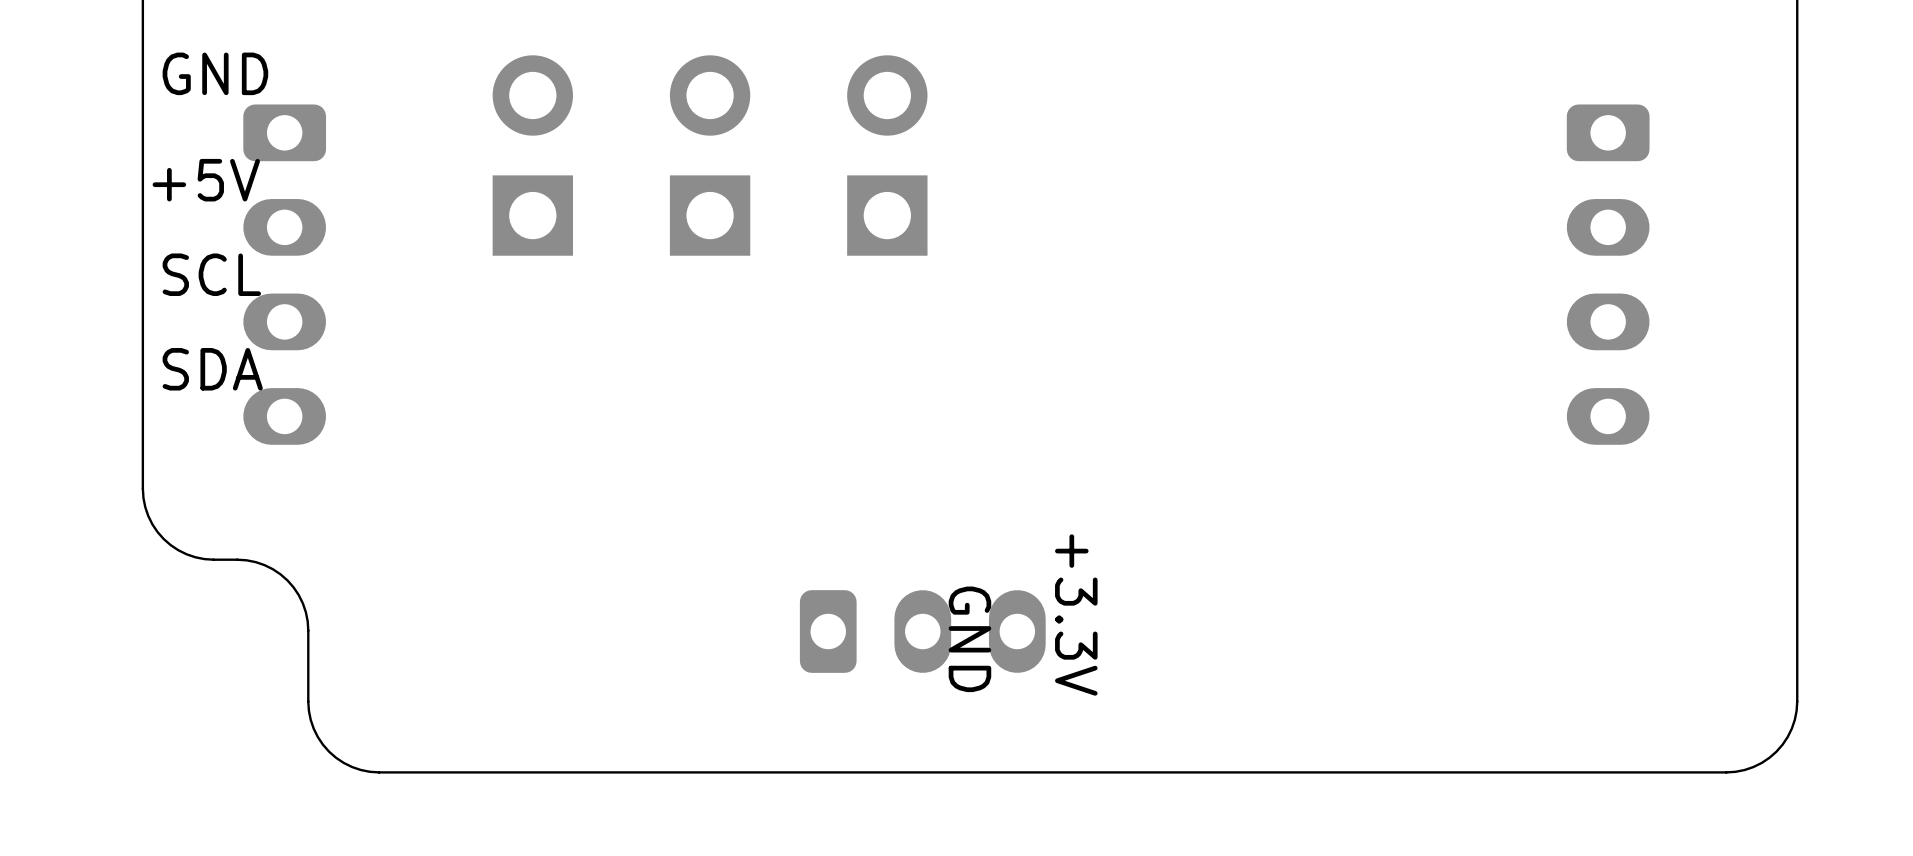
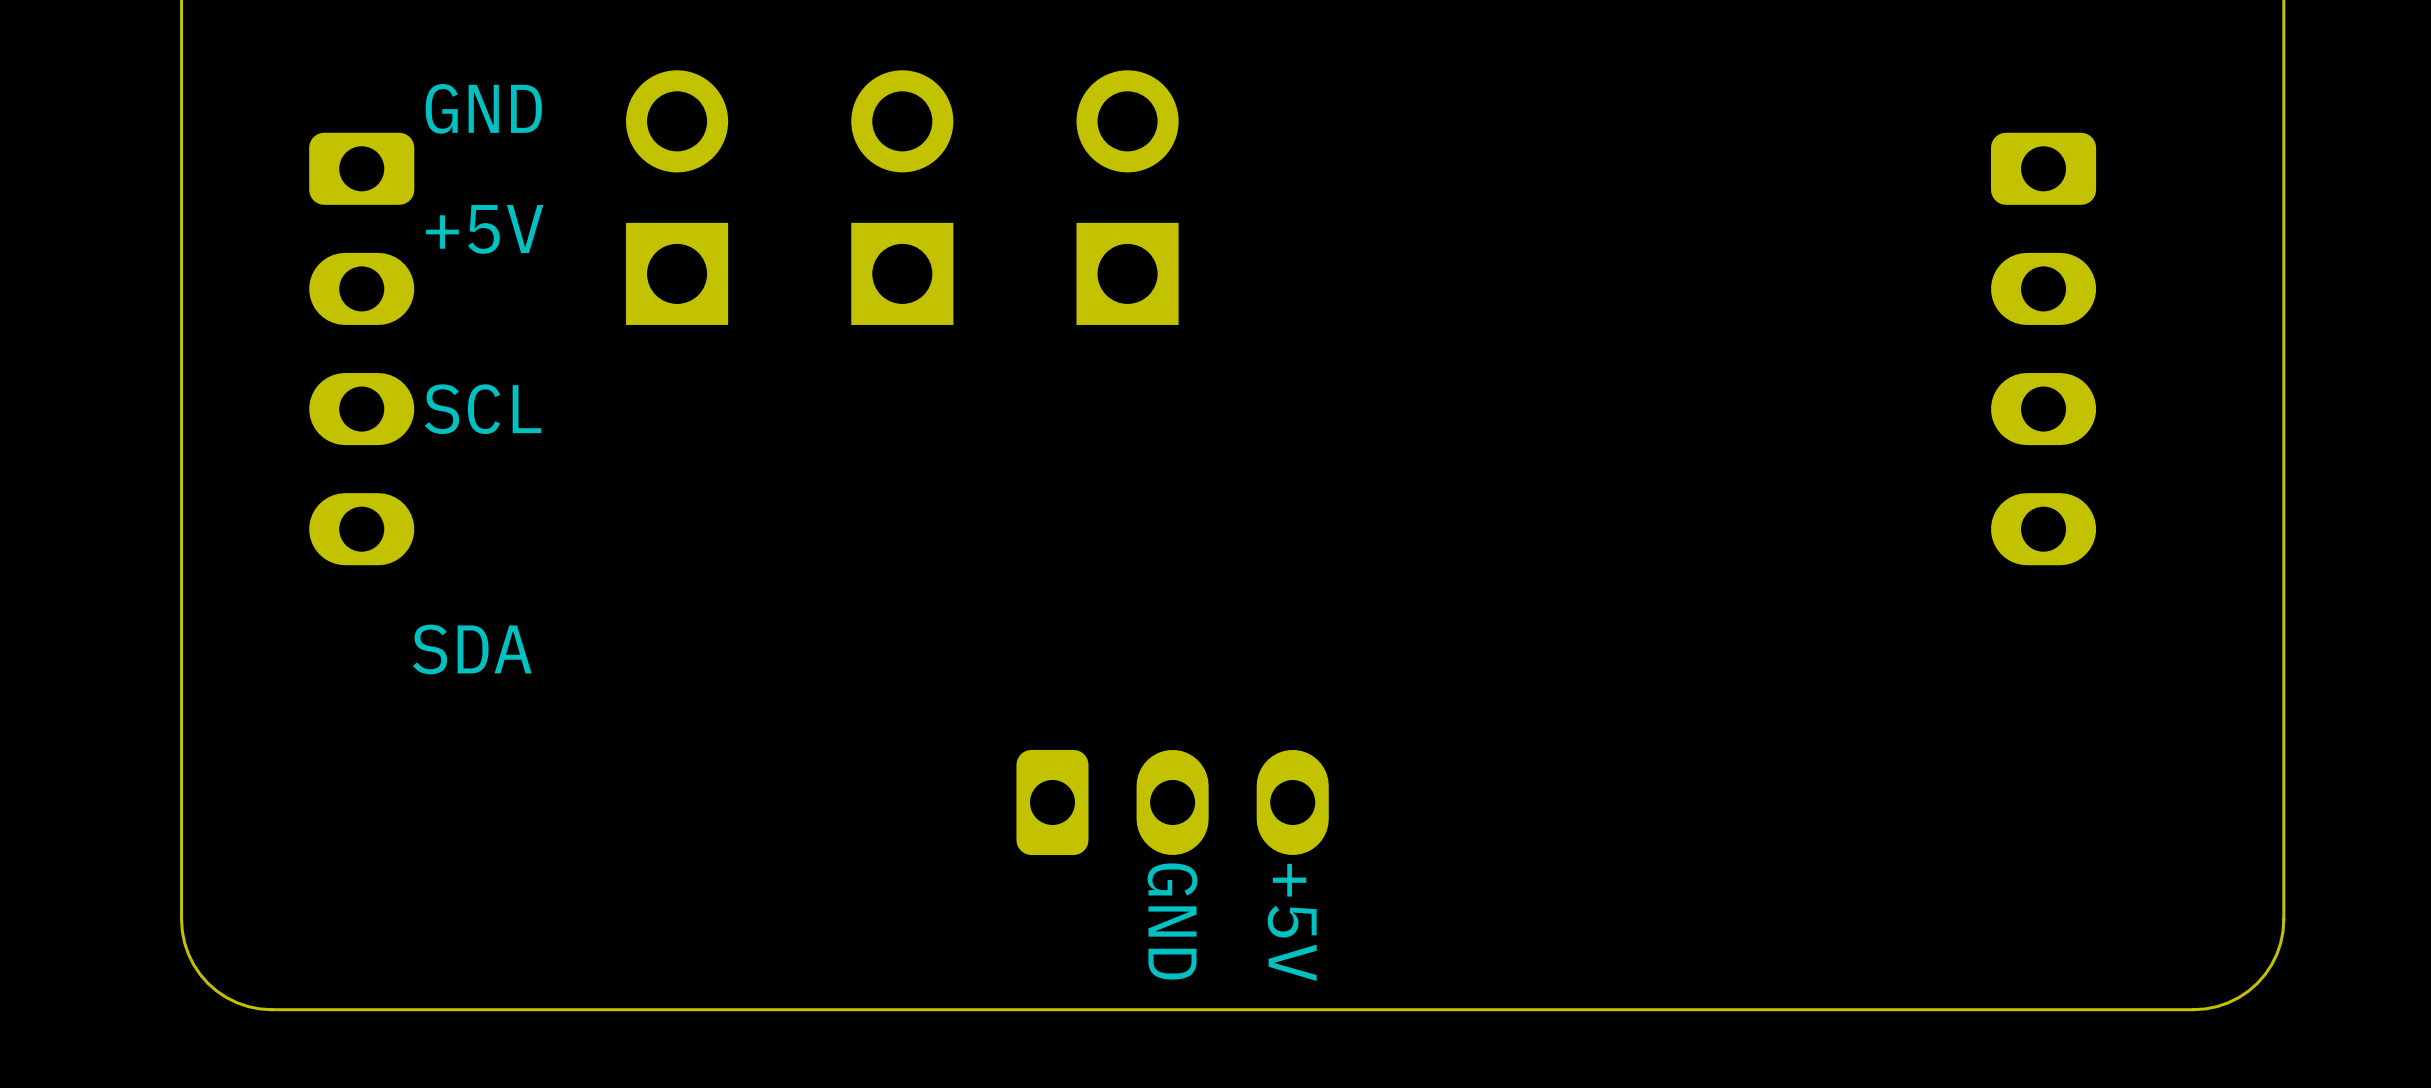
text position: GND (215, 73) -> GND (483, 108)
text position: +5V (206, 180) -> +5V (484, 229)
text position: SCL (211, 274) -> SCL (483, 409)
text position: SDA (212, 369) -> SDA (472, 649)
board edge: (142, 488) (145, 507) (152, 524) (163, 538) (178, 550) (204, 559) (255, 562) (272, 569) (293, 587) (302, 603) (307, 621) (308, 701) (313, 728) (322, 744) (336, 757) (352, 767) (369, 771) (1726, 772) (1753, 767) (1776, 751) (1791, 728) (1797, 701) -> (181, 621) (181, 919) (184, 942) (193, 964) (207, 983) (226, 997) (237, 1002) (259, 1008) (2193, 1009) (2217, 1006) (2228, 1002) (2248, 991) (2265, 974) (2276, 954) (2280, 942) (2283, 919) (2283, 891)
text: +3.3V (1076, 615) -> none
text position: GND (969, 639) -> GND (1172, 921)
text: none -> +5V (1292, 922)

